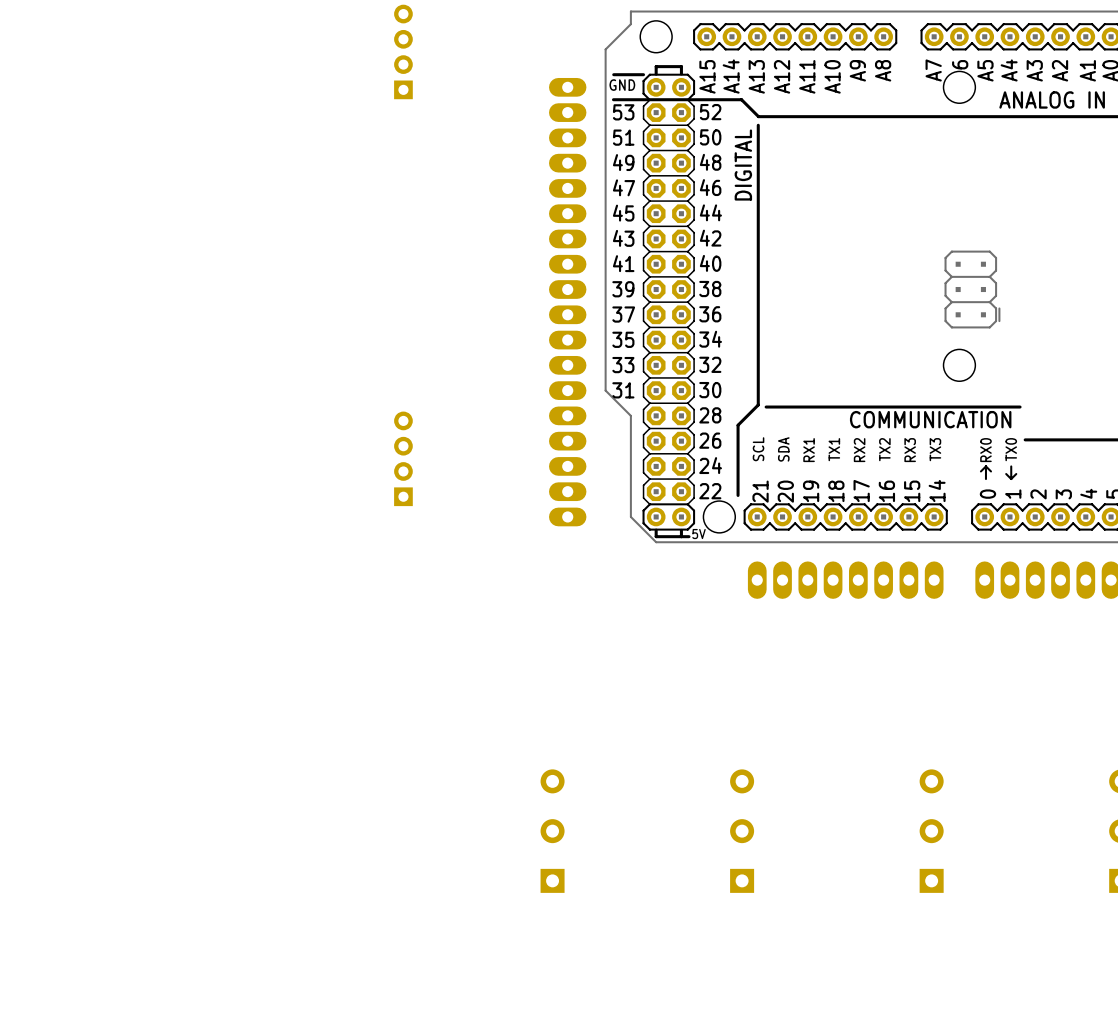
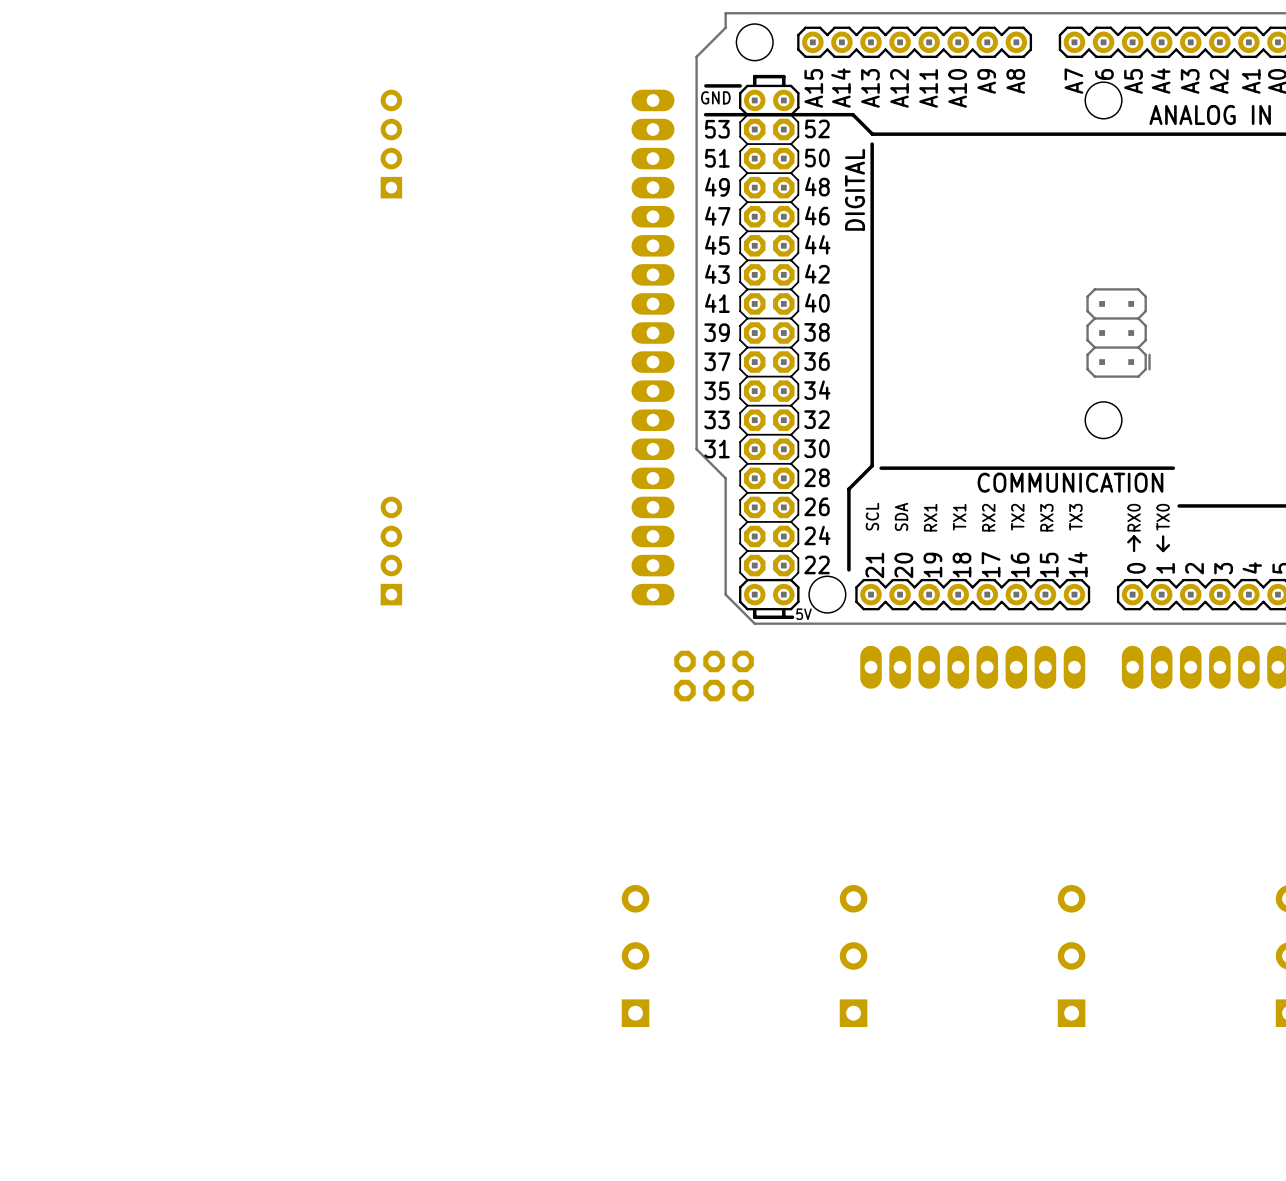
part position: (403, 51) -> (391, 144)
part position: (403, 458) -> (391, 551)
part: none -> (714, 676)

